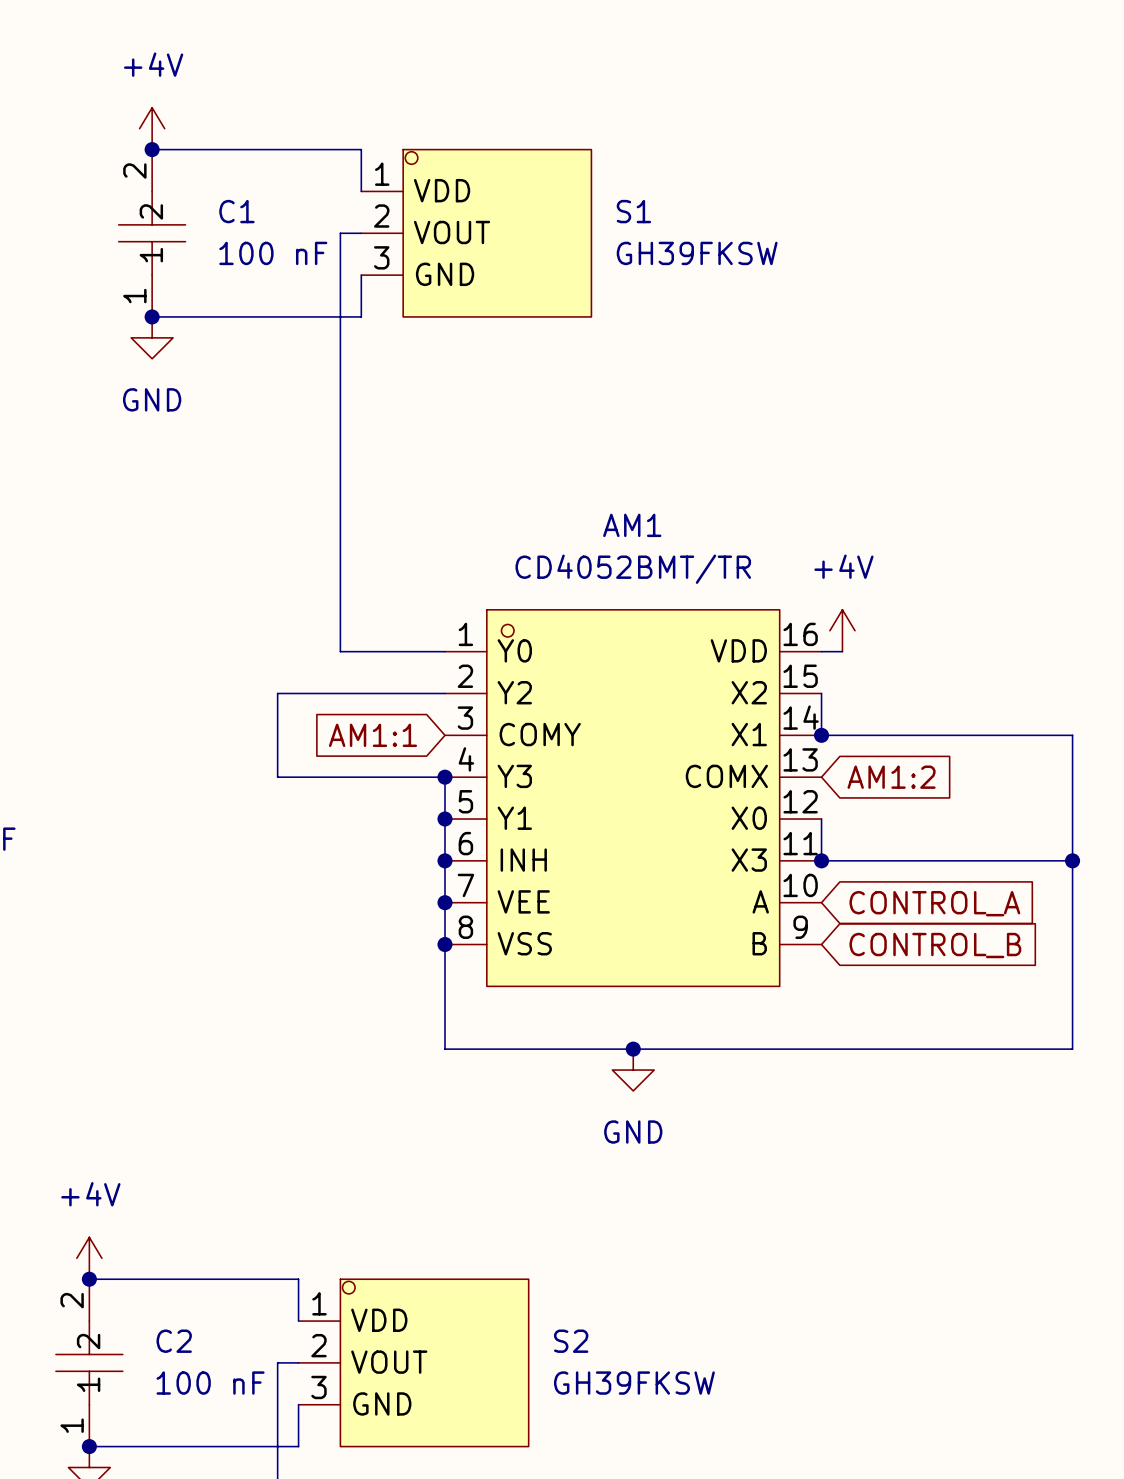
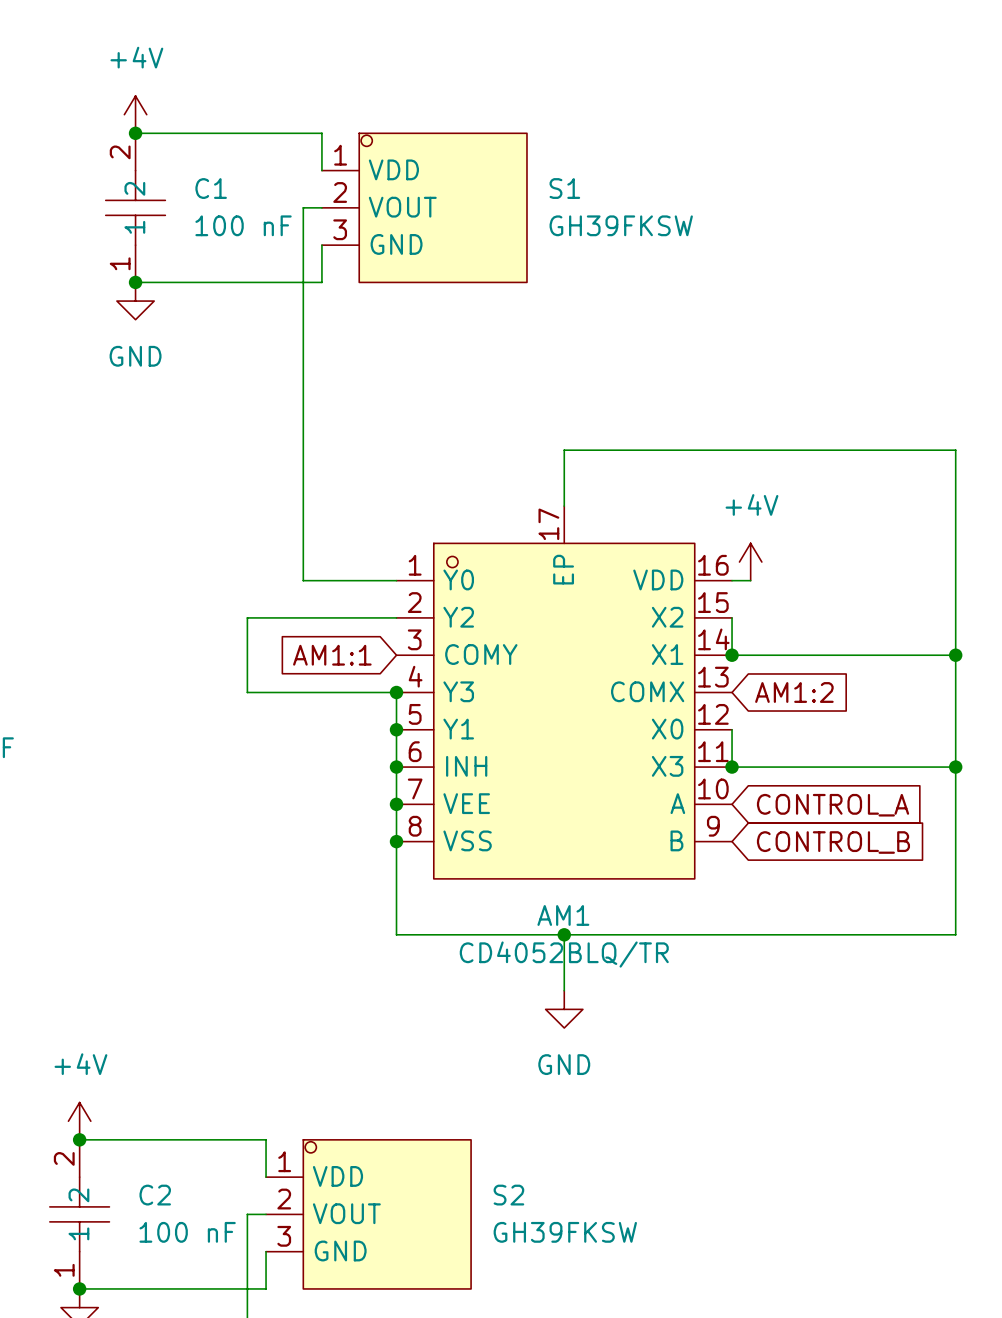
AM1 name position: AM1 (632, 525) -> AM1 (563, 915)
wire: none -> (564, 506) (564, 450) (955, 450) (955, 655)
AM1 value: CD4052BMT/TR (633, 569) -> CD4052BLQ/TR (564, 954)
AM1 symbol: [444, 609, 822, 987] -> [396, 506, 733, 879]
junction: none -> (955, 655)
wire: none -> (564, 934) (564, 990)
power symbol position: GND (633, 1070) -> GND (564, 1009)

